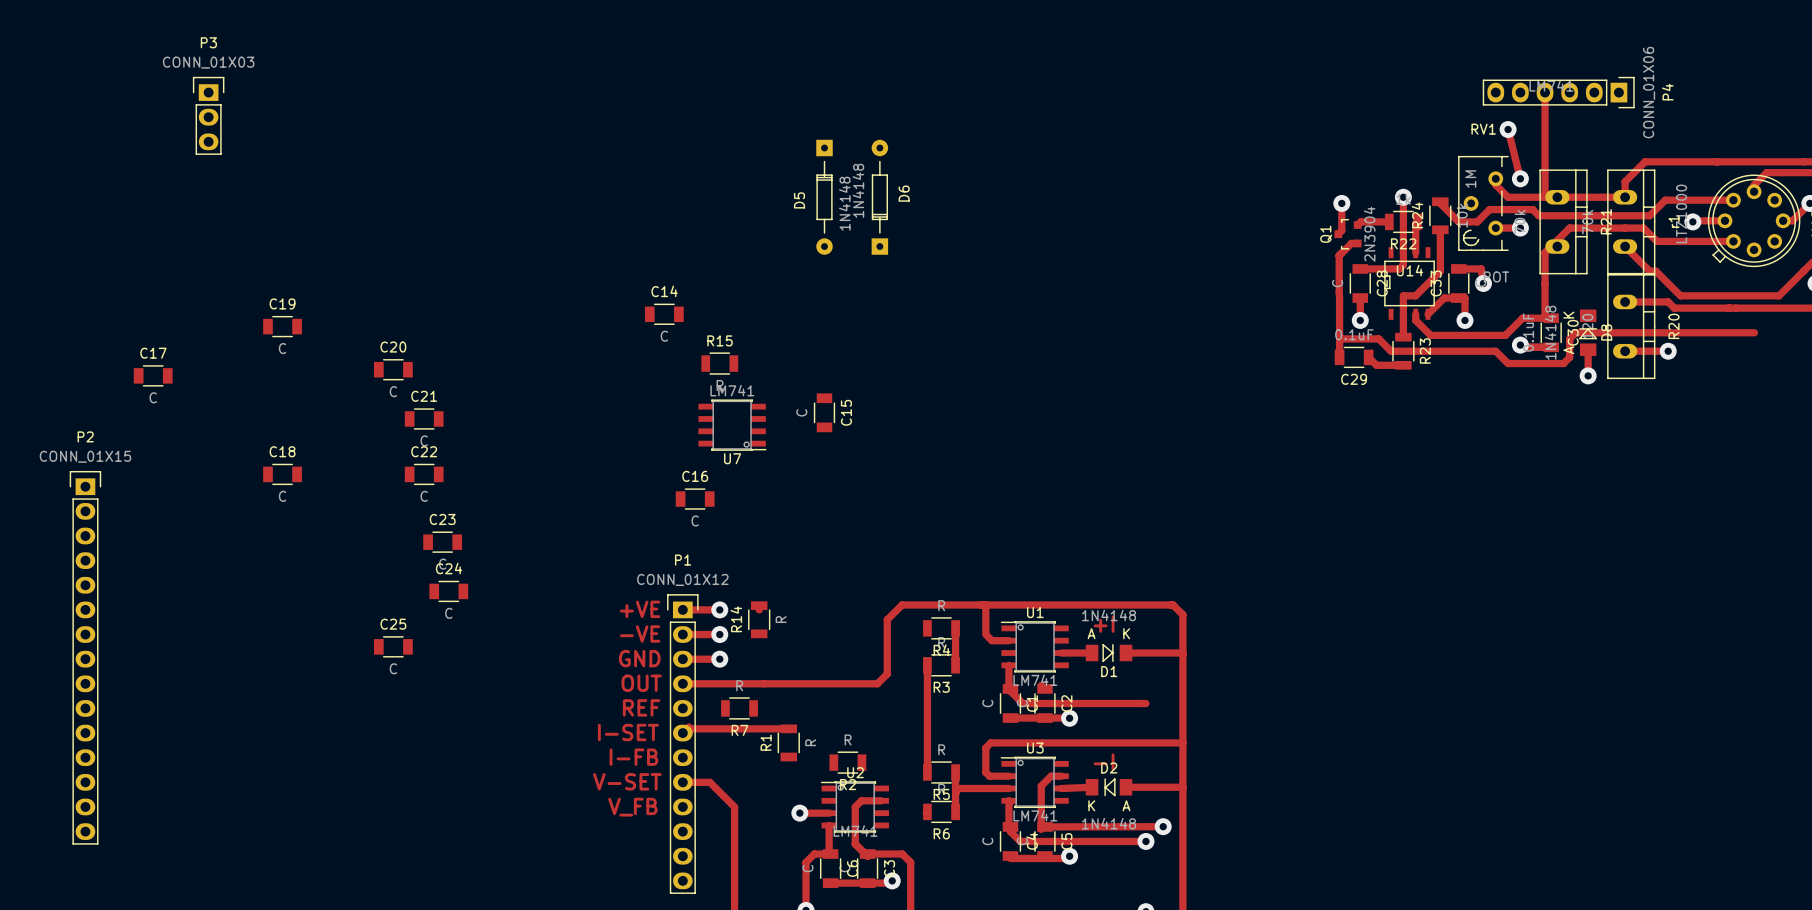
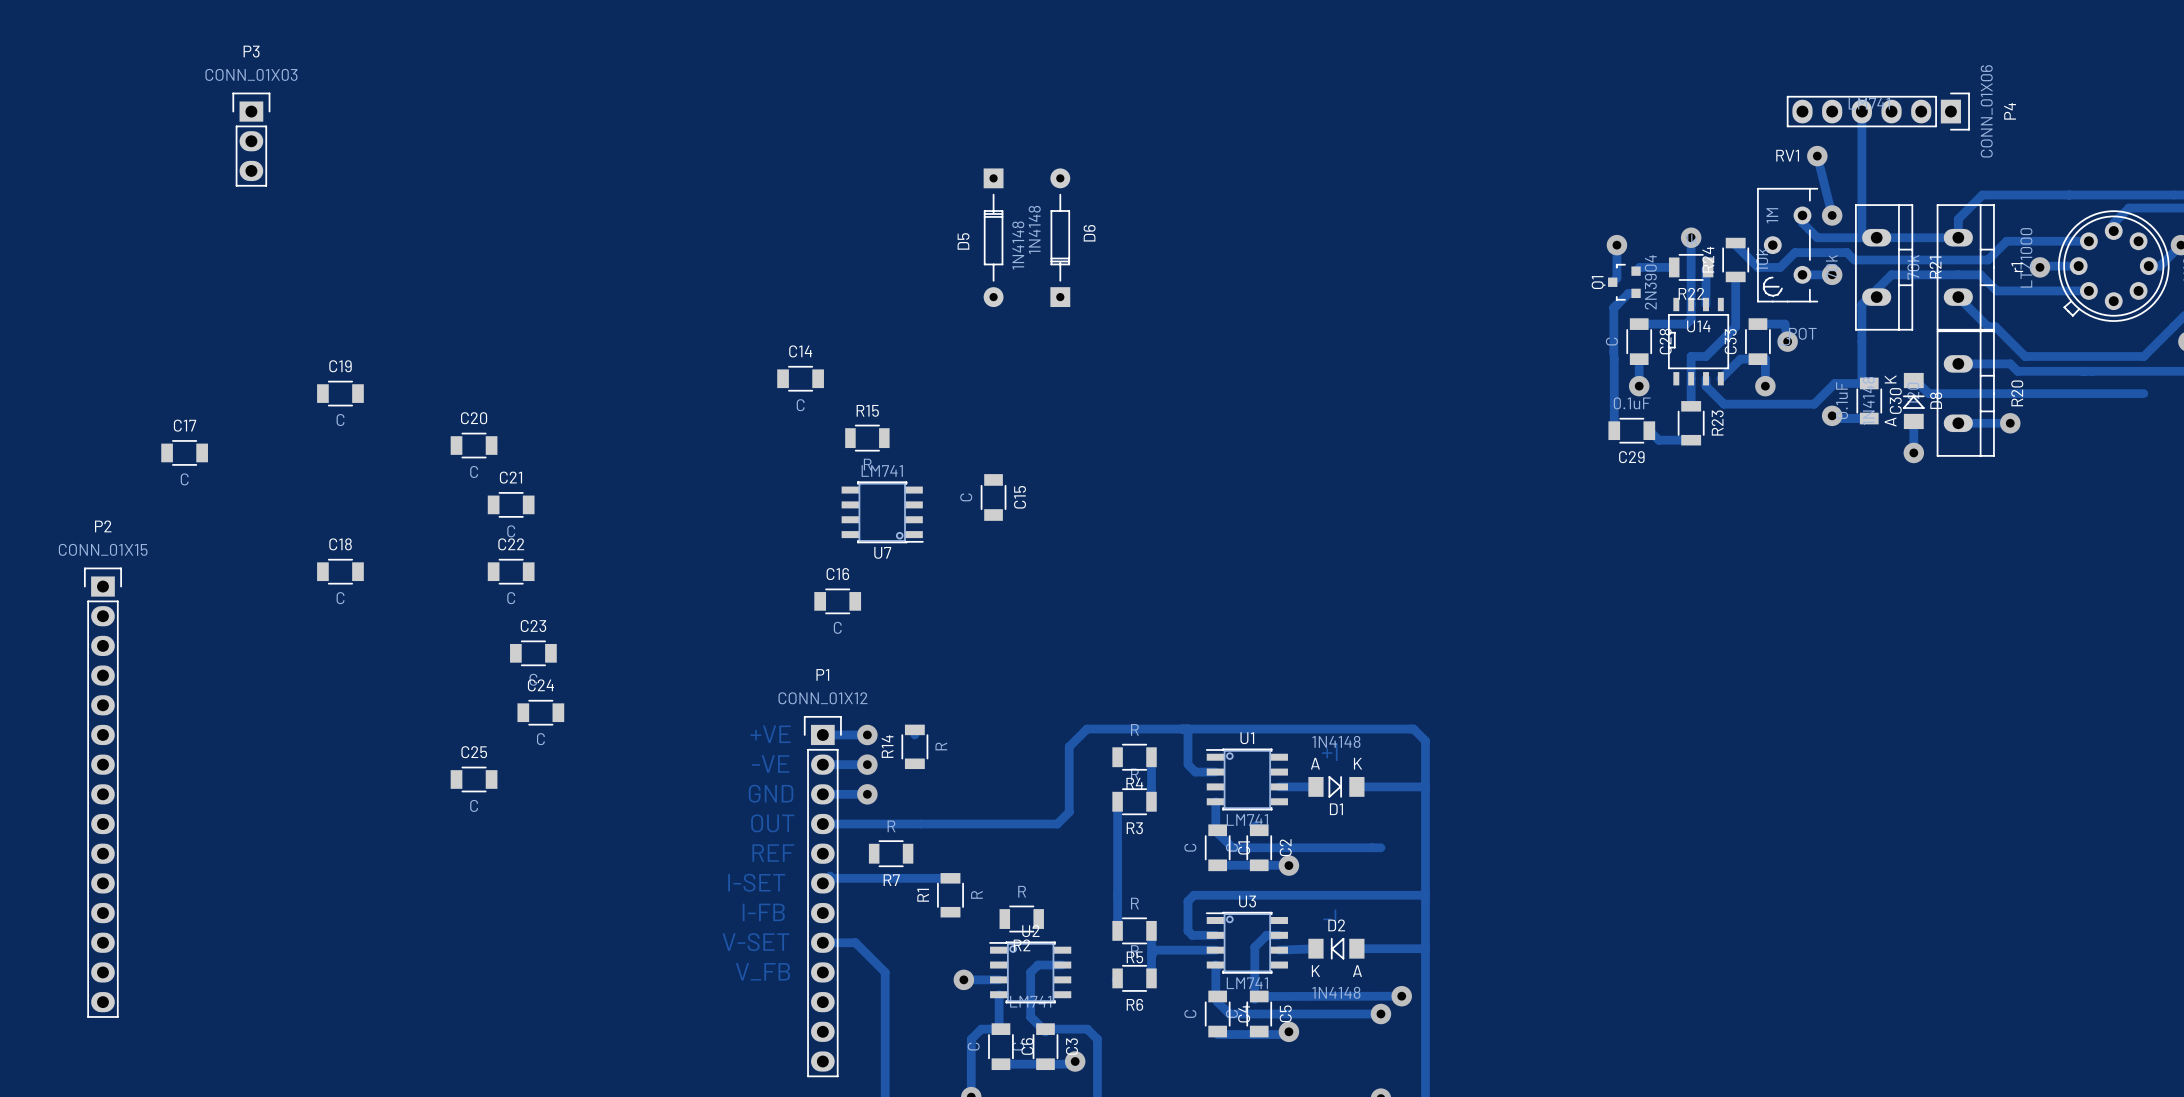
track: none -> (1915, 380) (1928, 393) (2143, 393)
track: (1754, 332) (1575, 332) (1569, 338) (1569, 357) (1563, 363) (1508, 363) (1495, 351) (1391, 351) (1378, 338) (1339, 338) -> none

